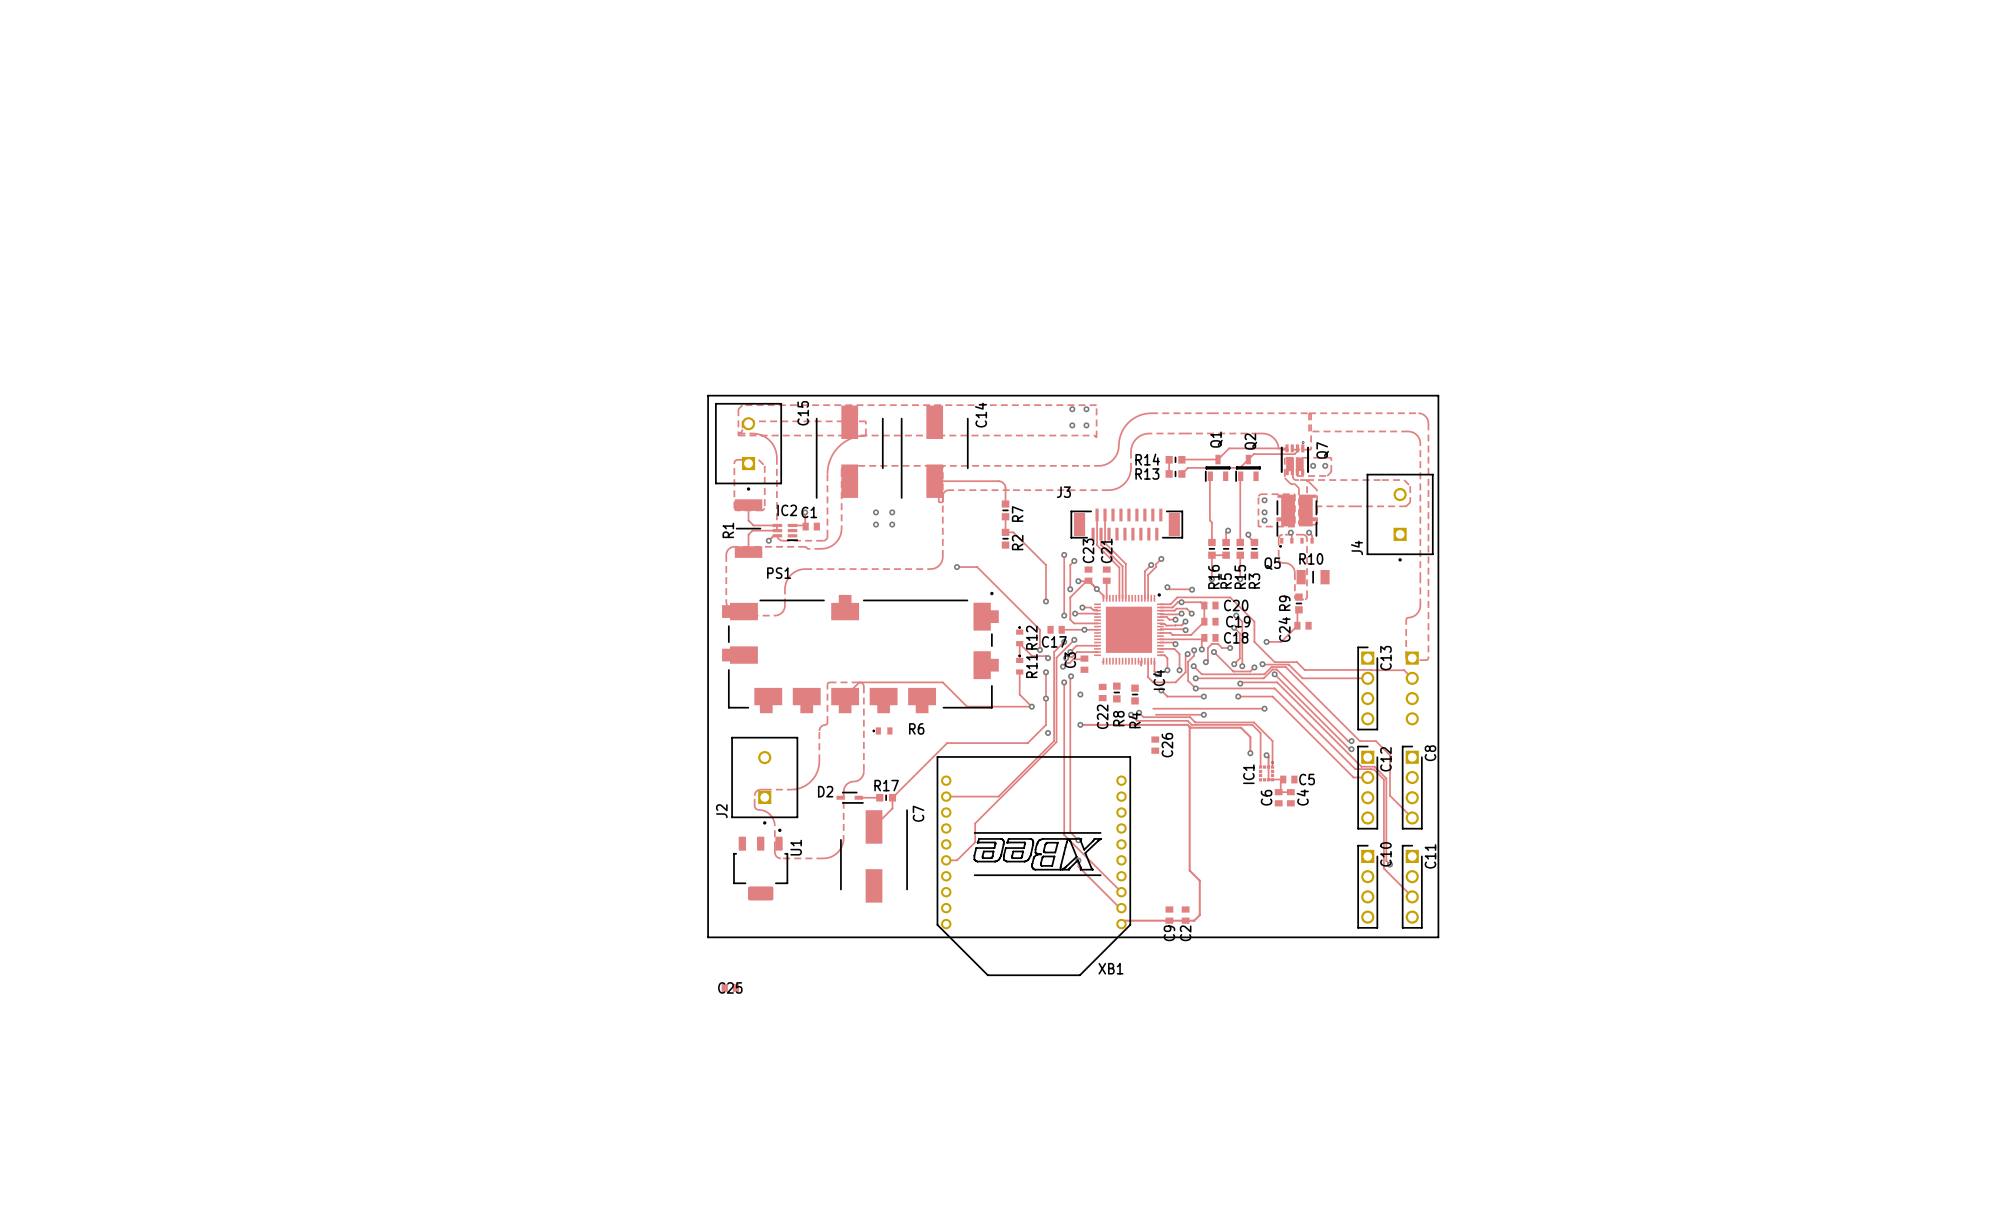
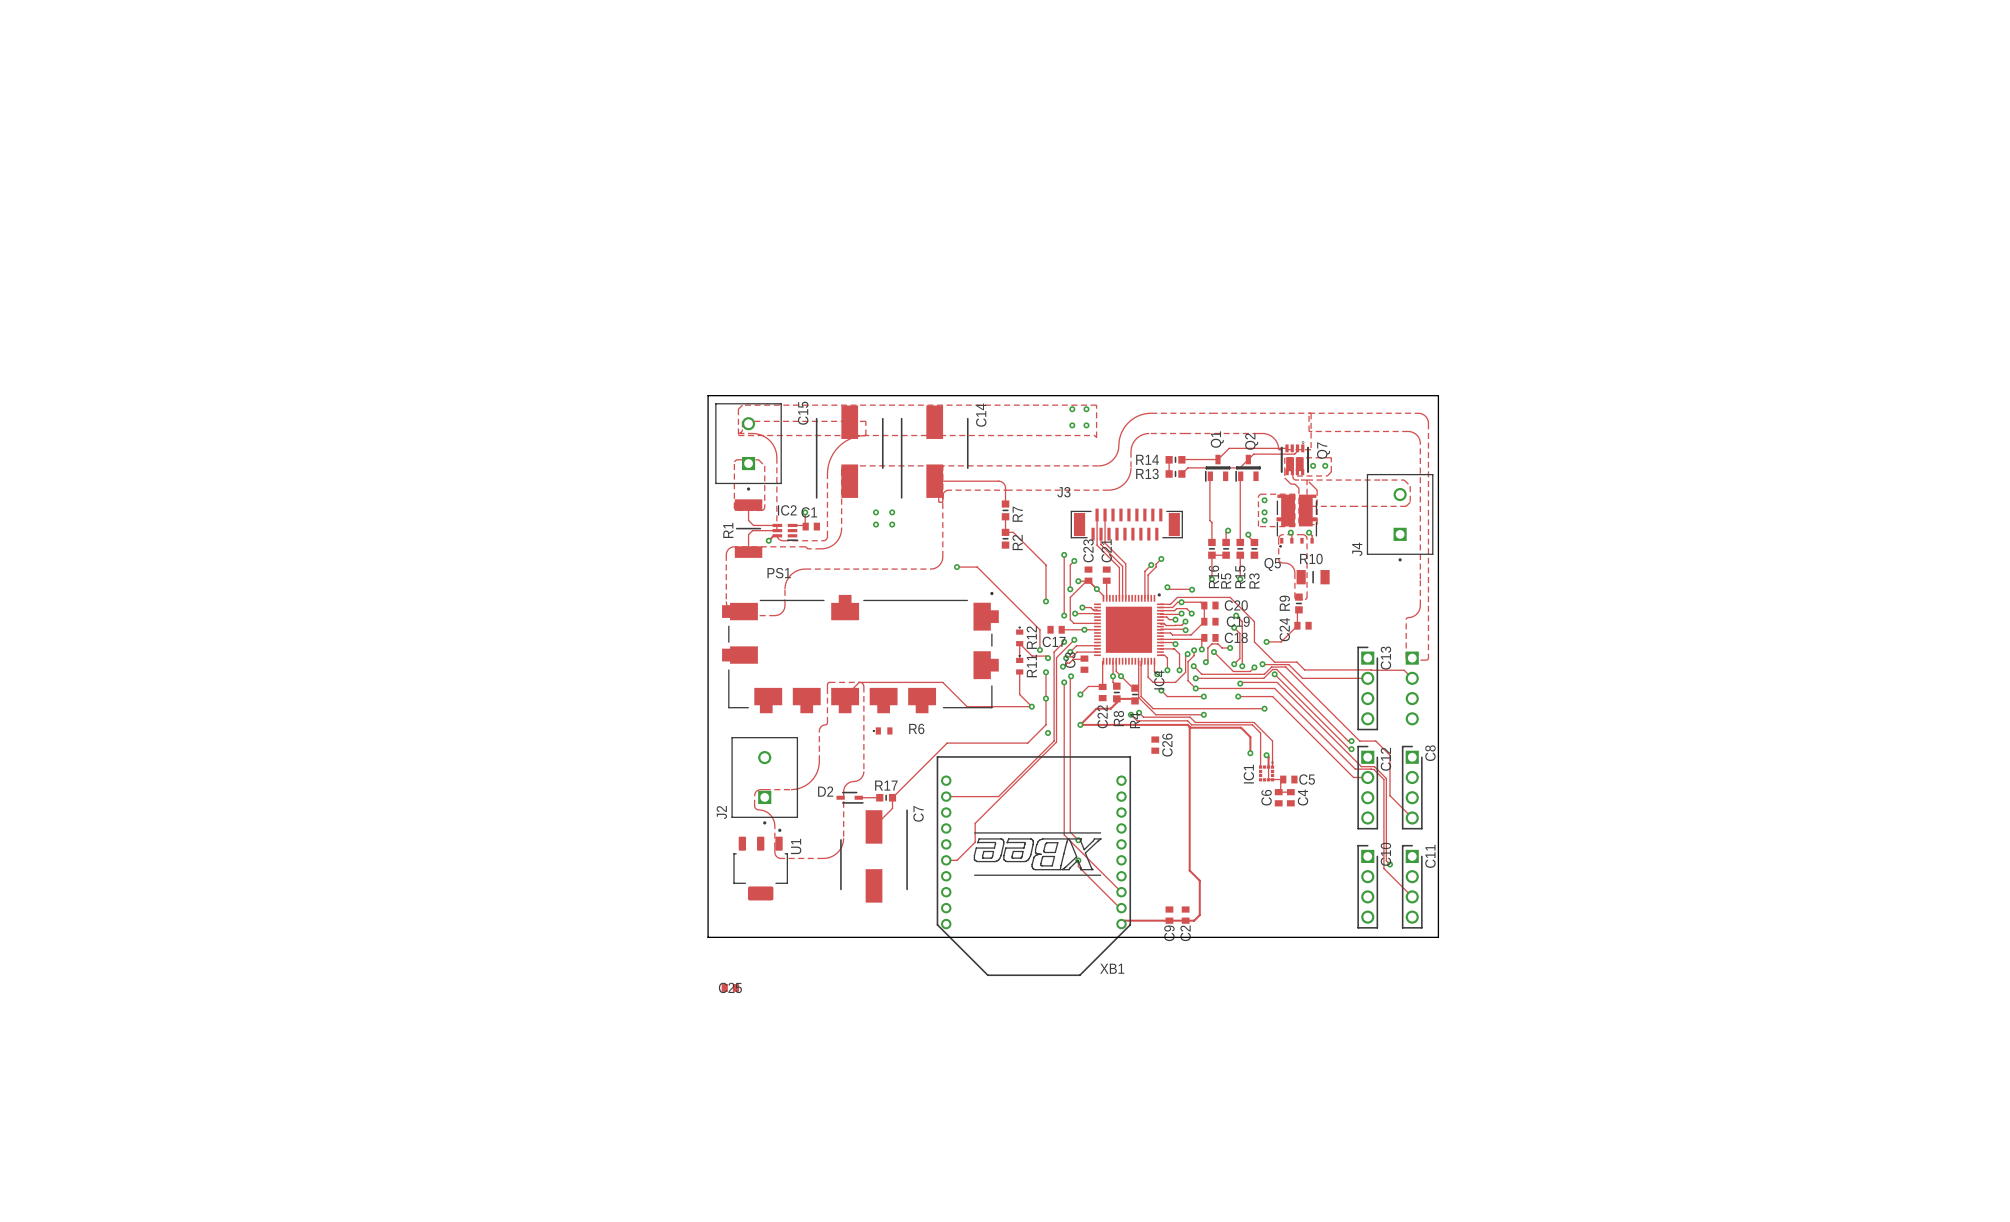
track: none -> (1113, 661) (1113, 682) (1116, 686)
track: none -> (1116, 661) (1116, 671) (1130, 686)
track: none -> (1138, 661) (1138, 697) (1155, 714)
track: none -> (1102, 662) (1102, 686) (1088, 686) (1080, 694)
track: none -> (1141, 665) (1141, 696) (1153, 708)
via: none -> (1113, 676)
via: none -> (1121, 676)
track: none -> (1130, 698) (1116, 698) (1116, 702) (1110, 708) (1096, 708) (1080, 724)

